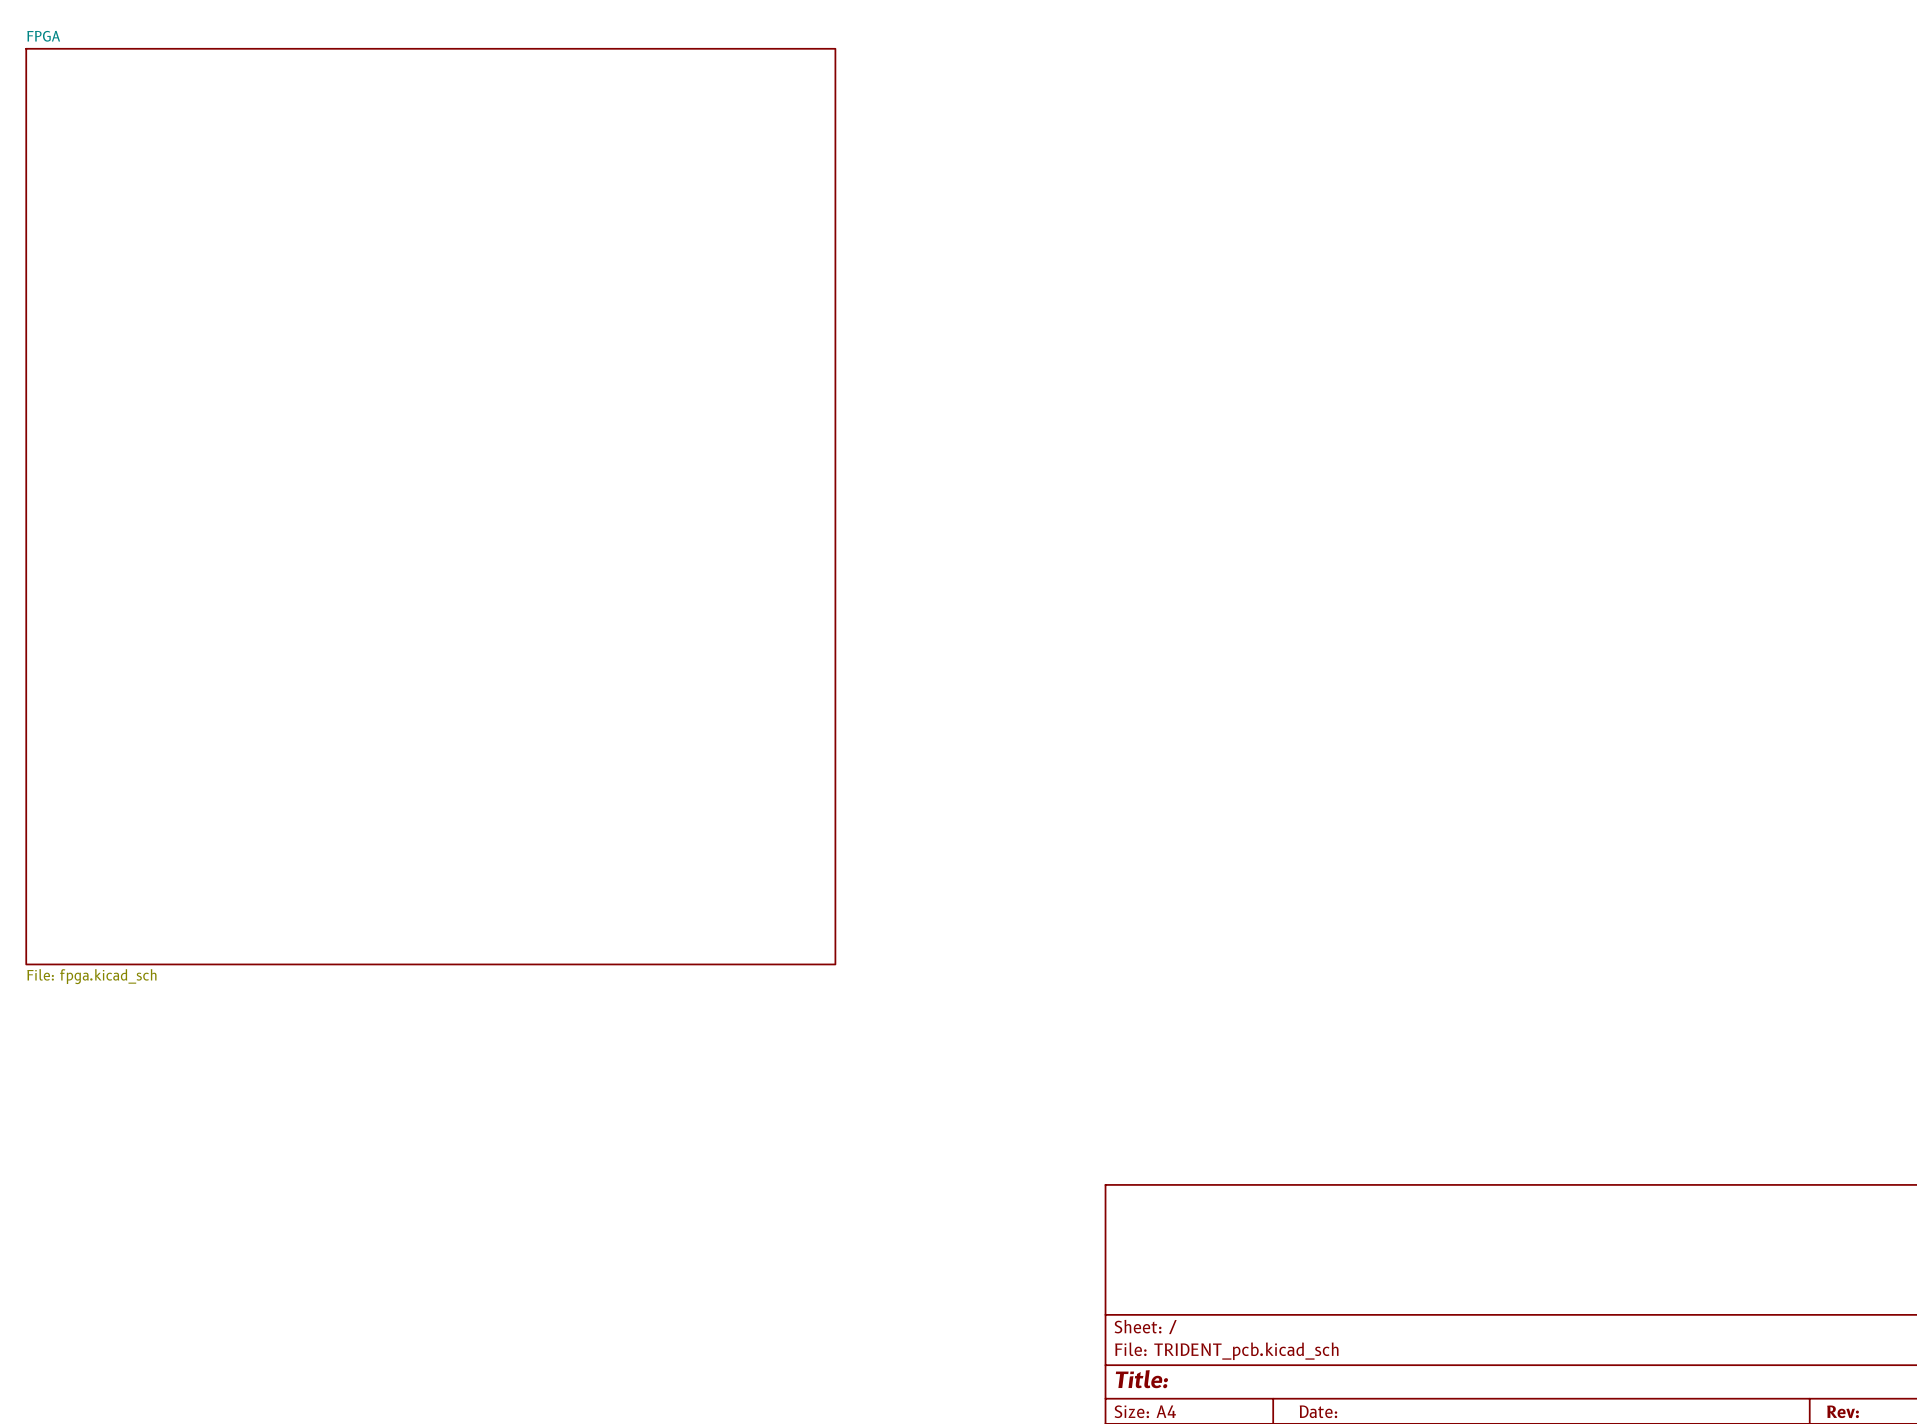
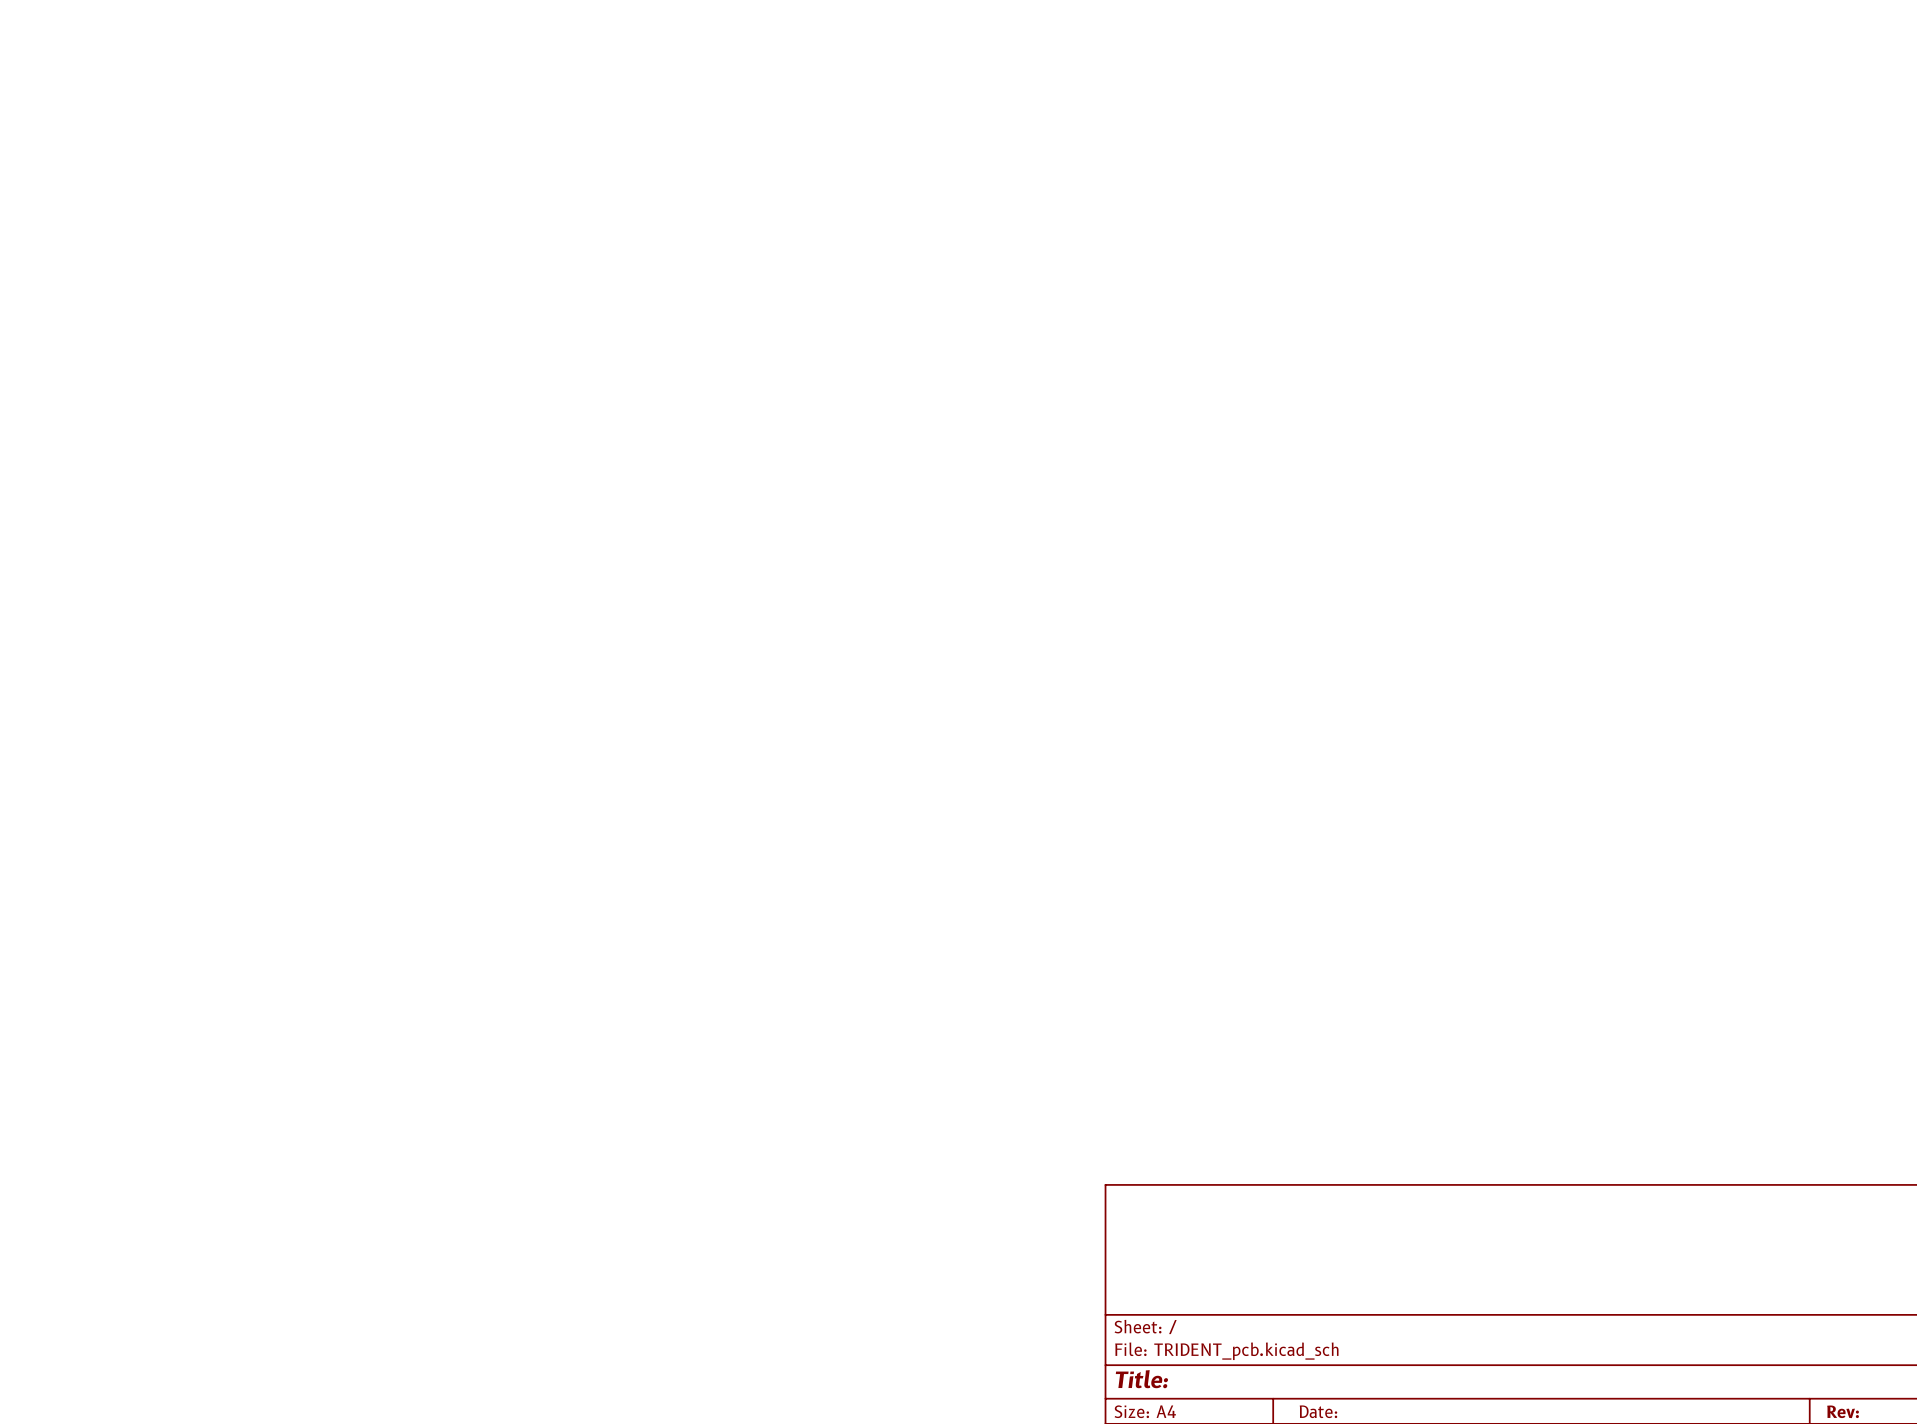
sheet FPGA: File: fpga.kicad_sch (430, 506) -> none

